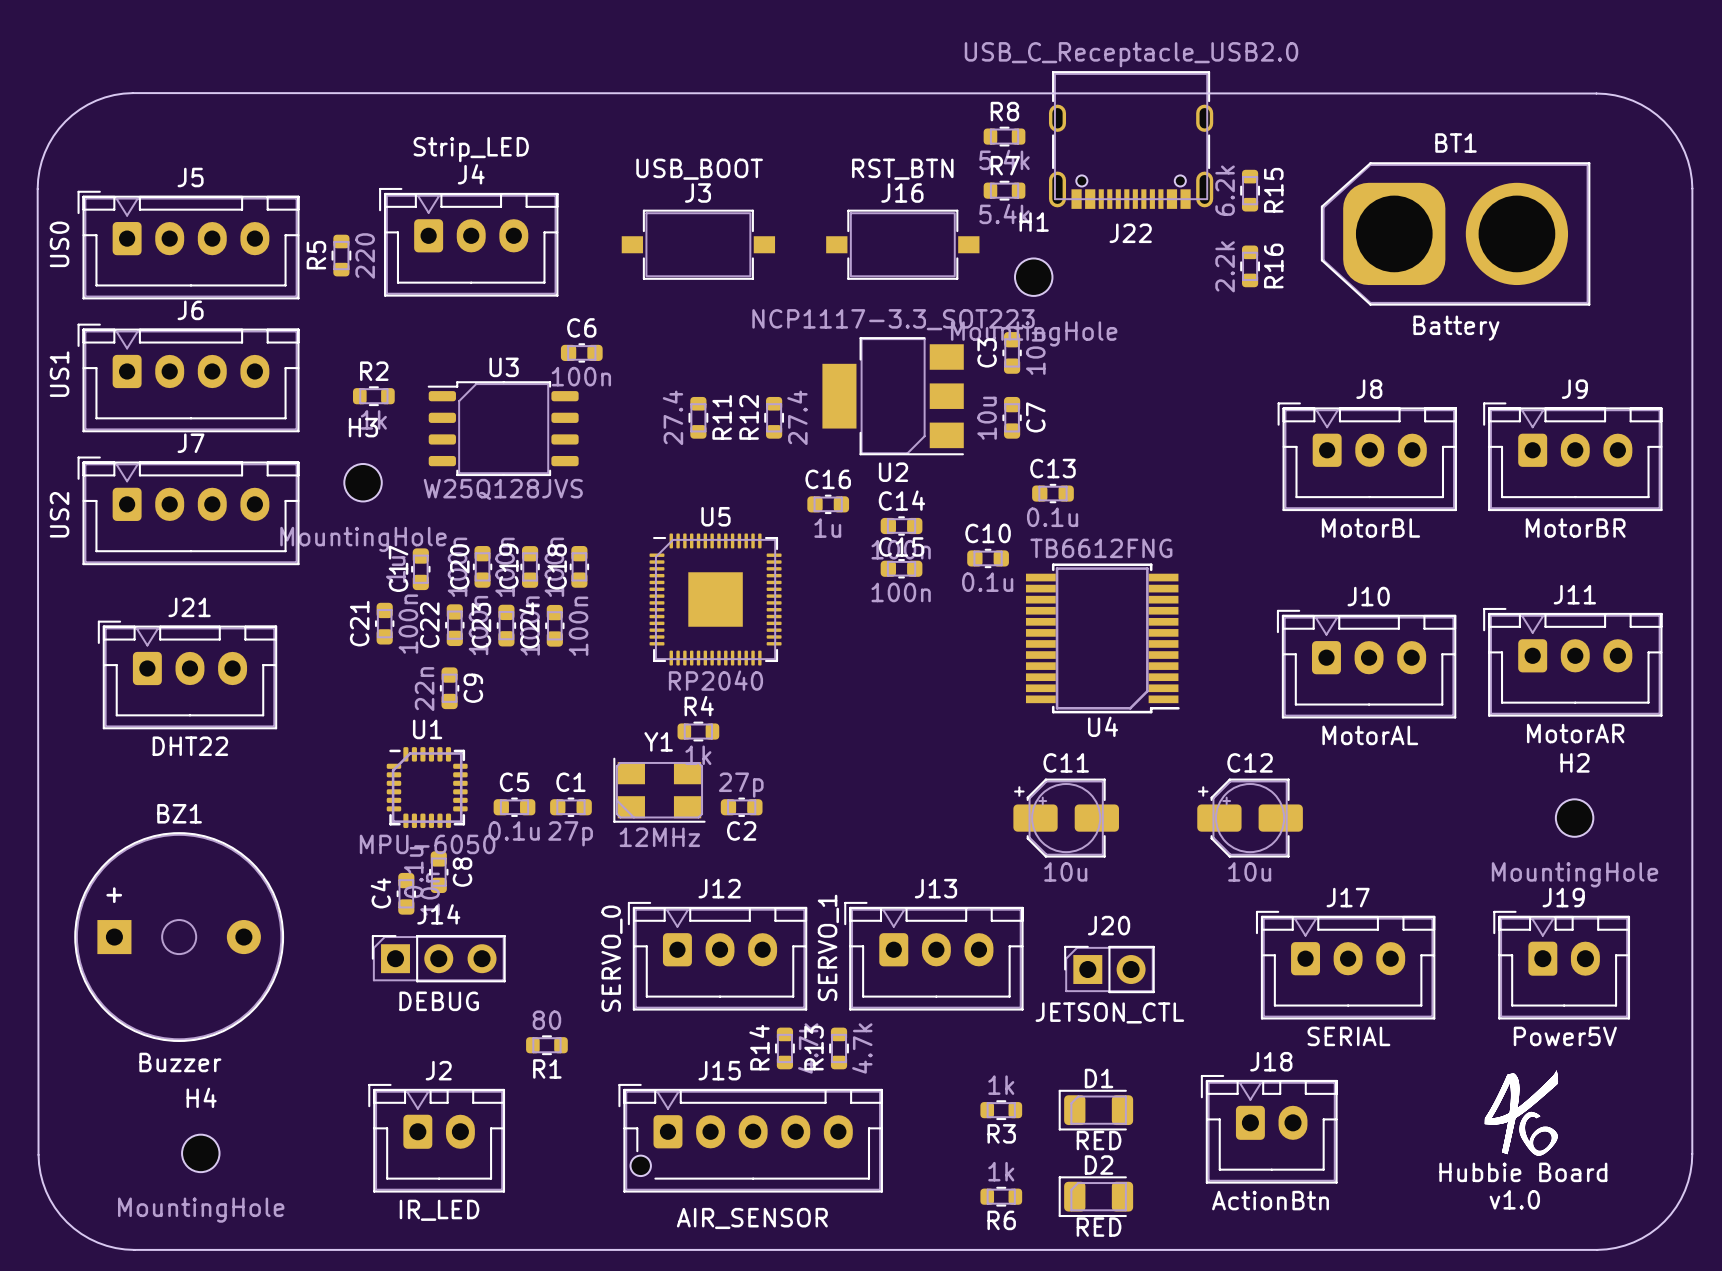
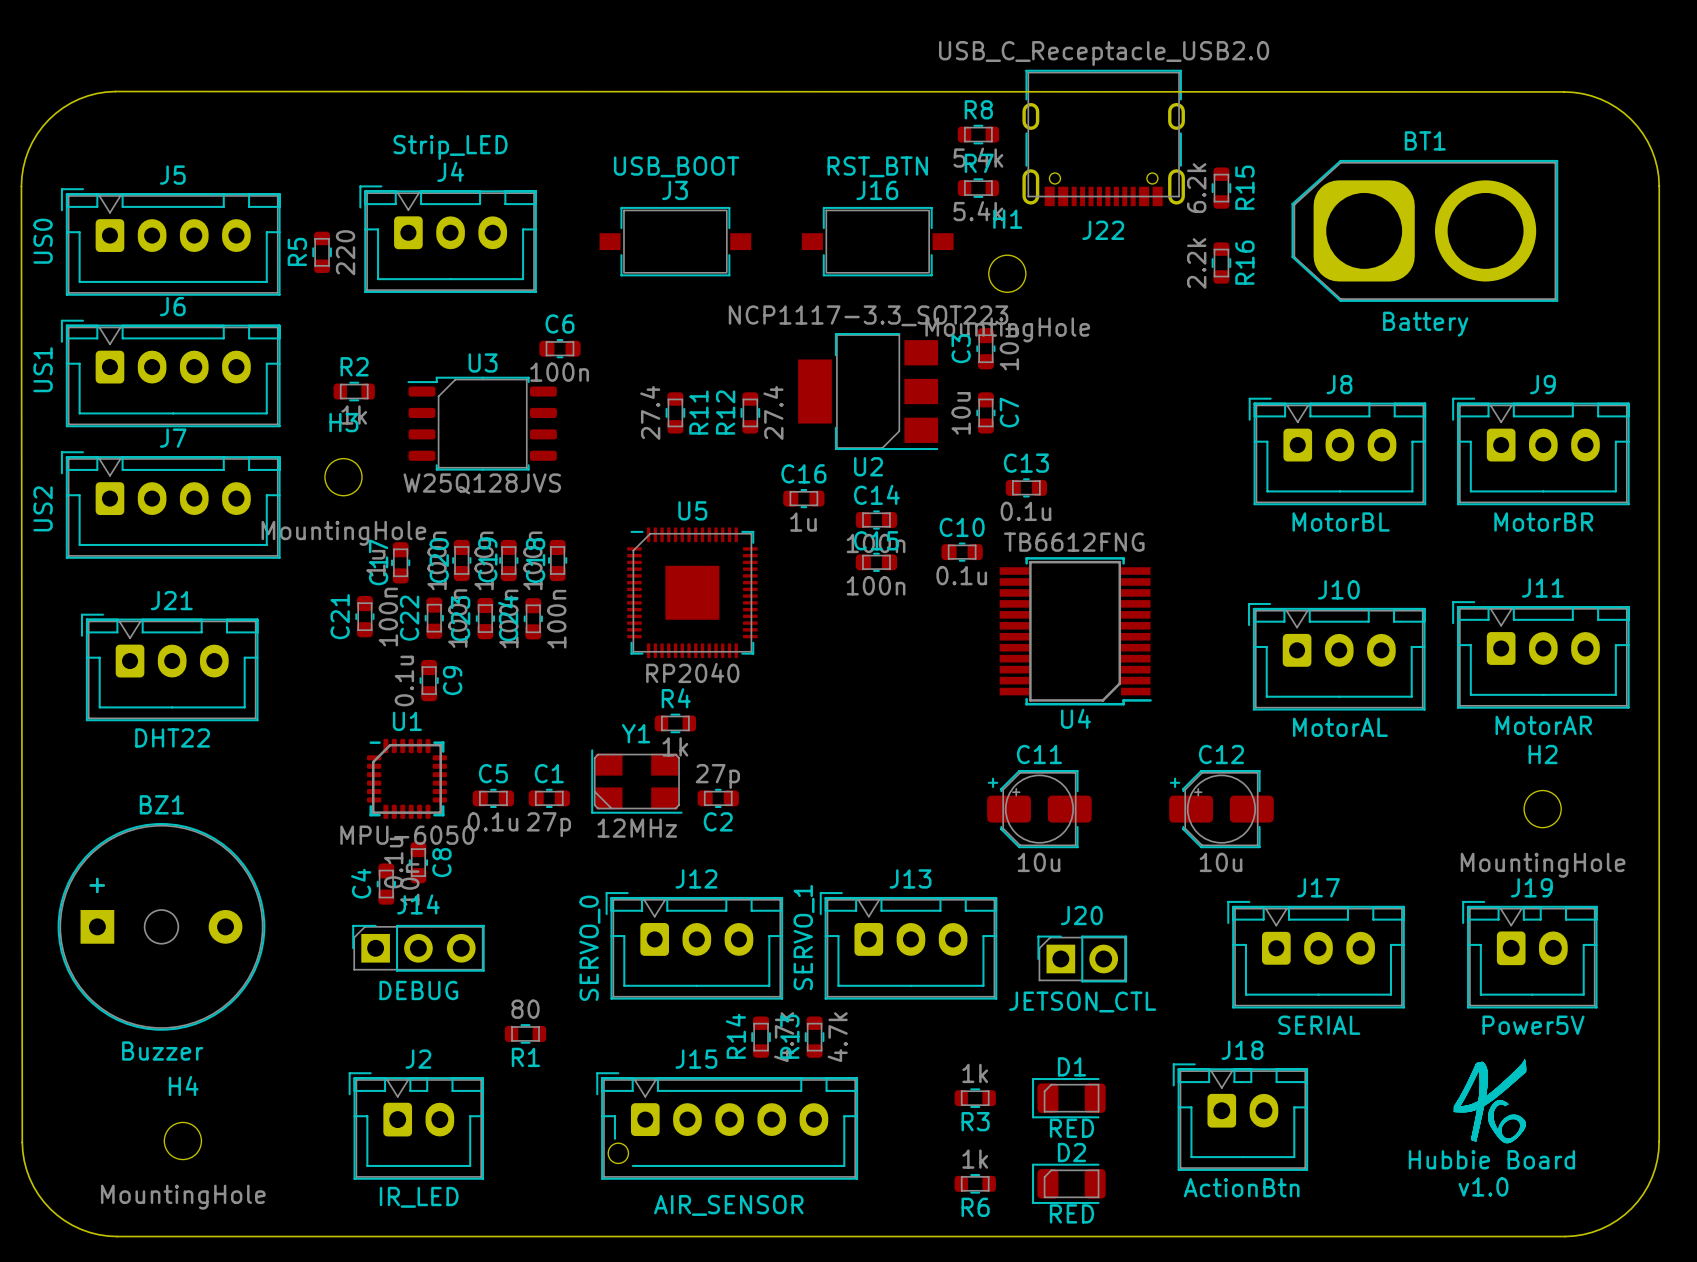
C9 value: 22n (424, 689) -> 0.1u (404, 681)

